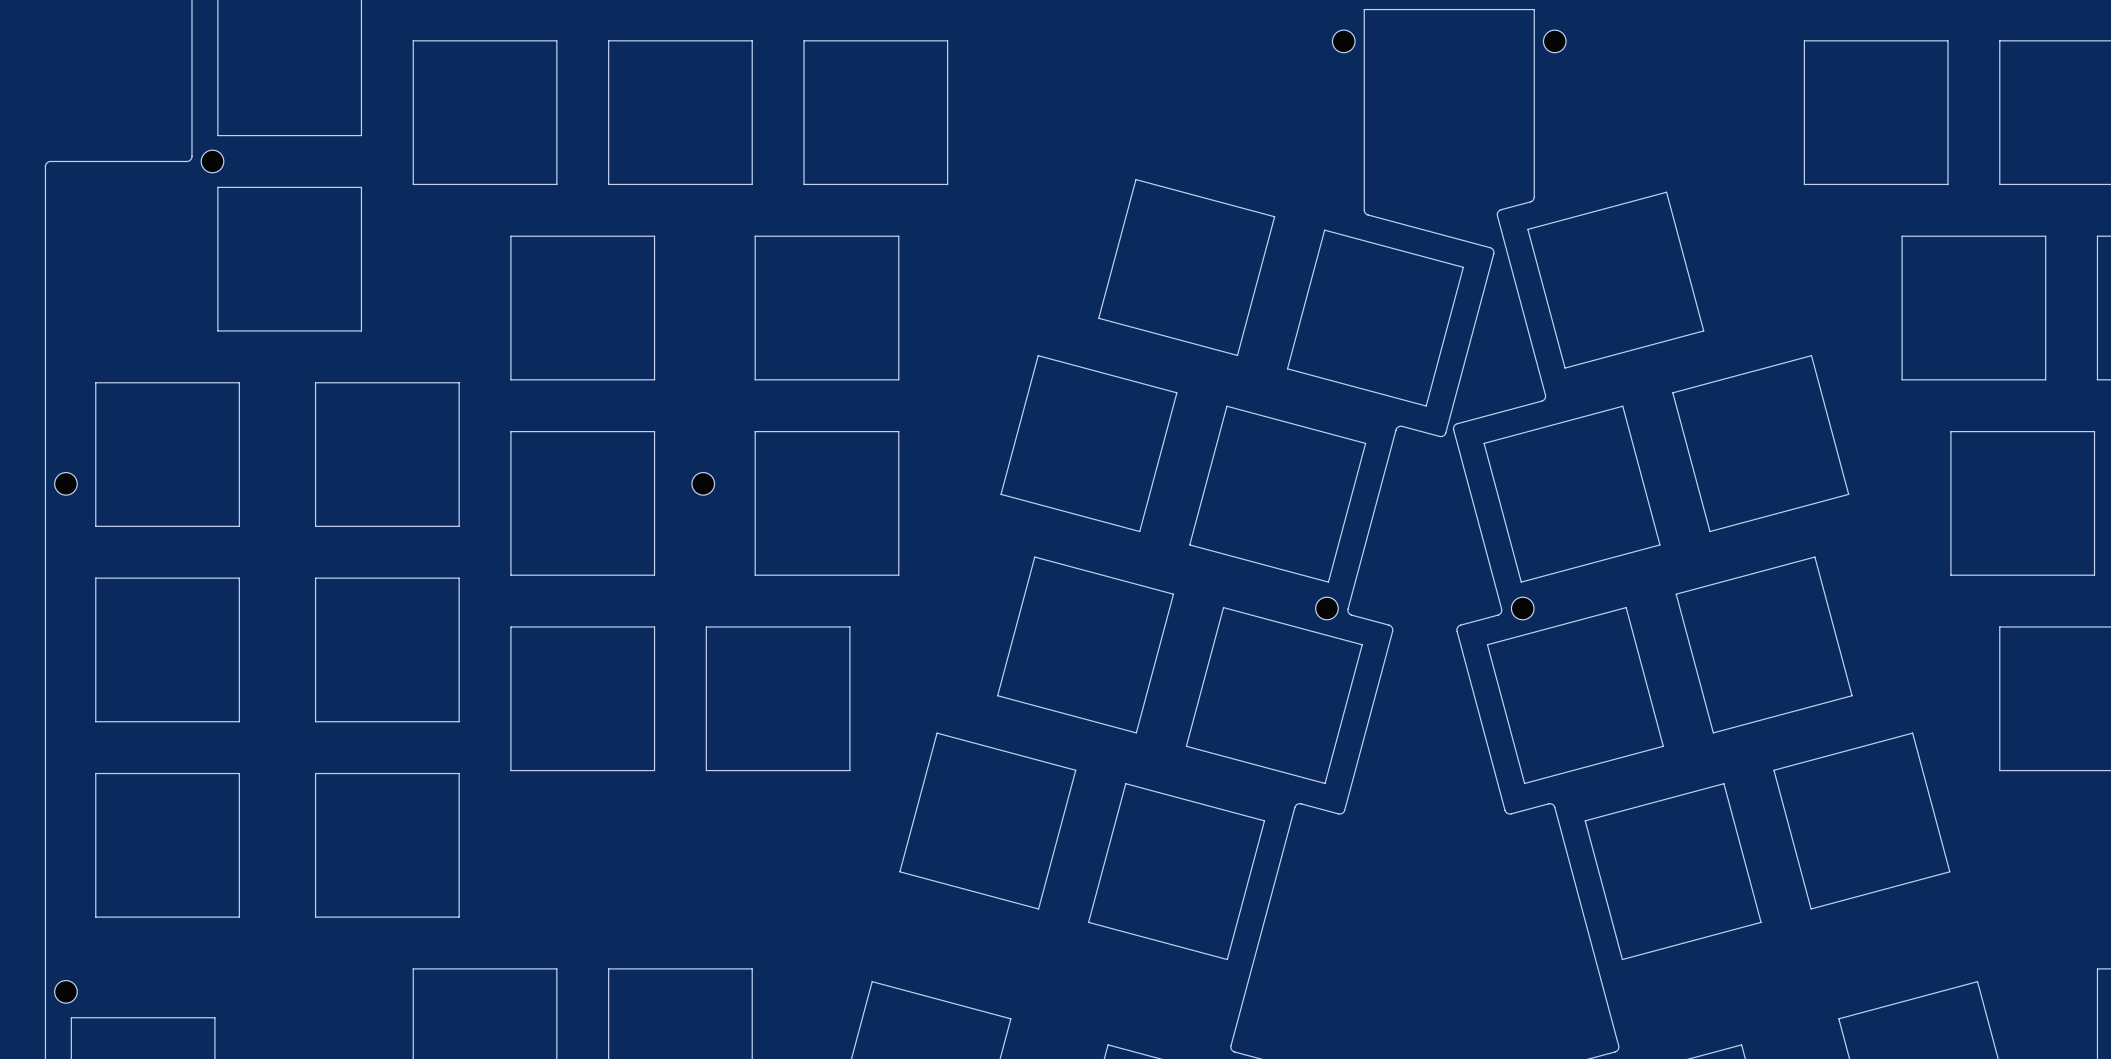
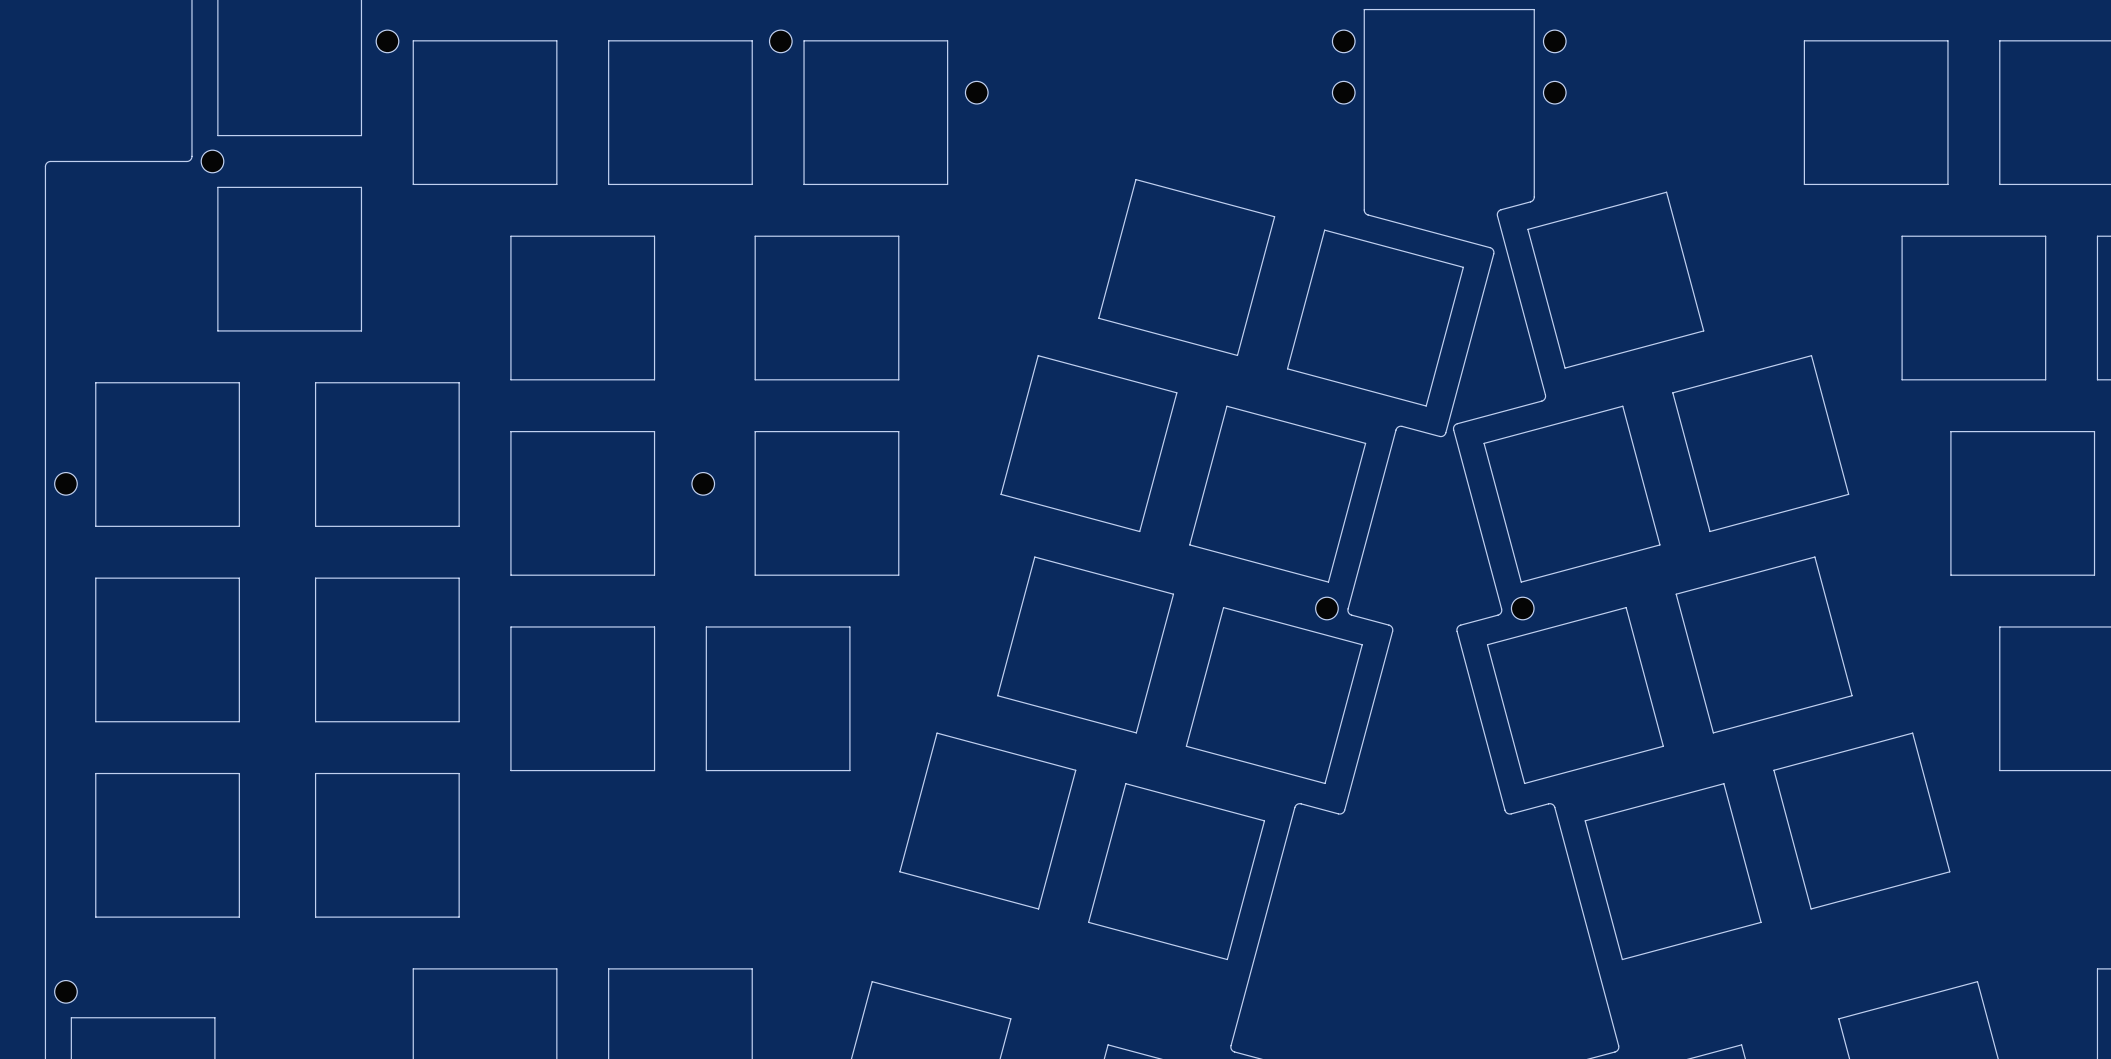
part: none -> (387, 41)
part: none -> (780, 41)
part: none -> (976, 92)
part: none -> (1343, 92)
part: none -> (1554, 92)

